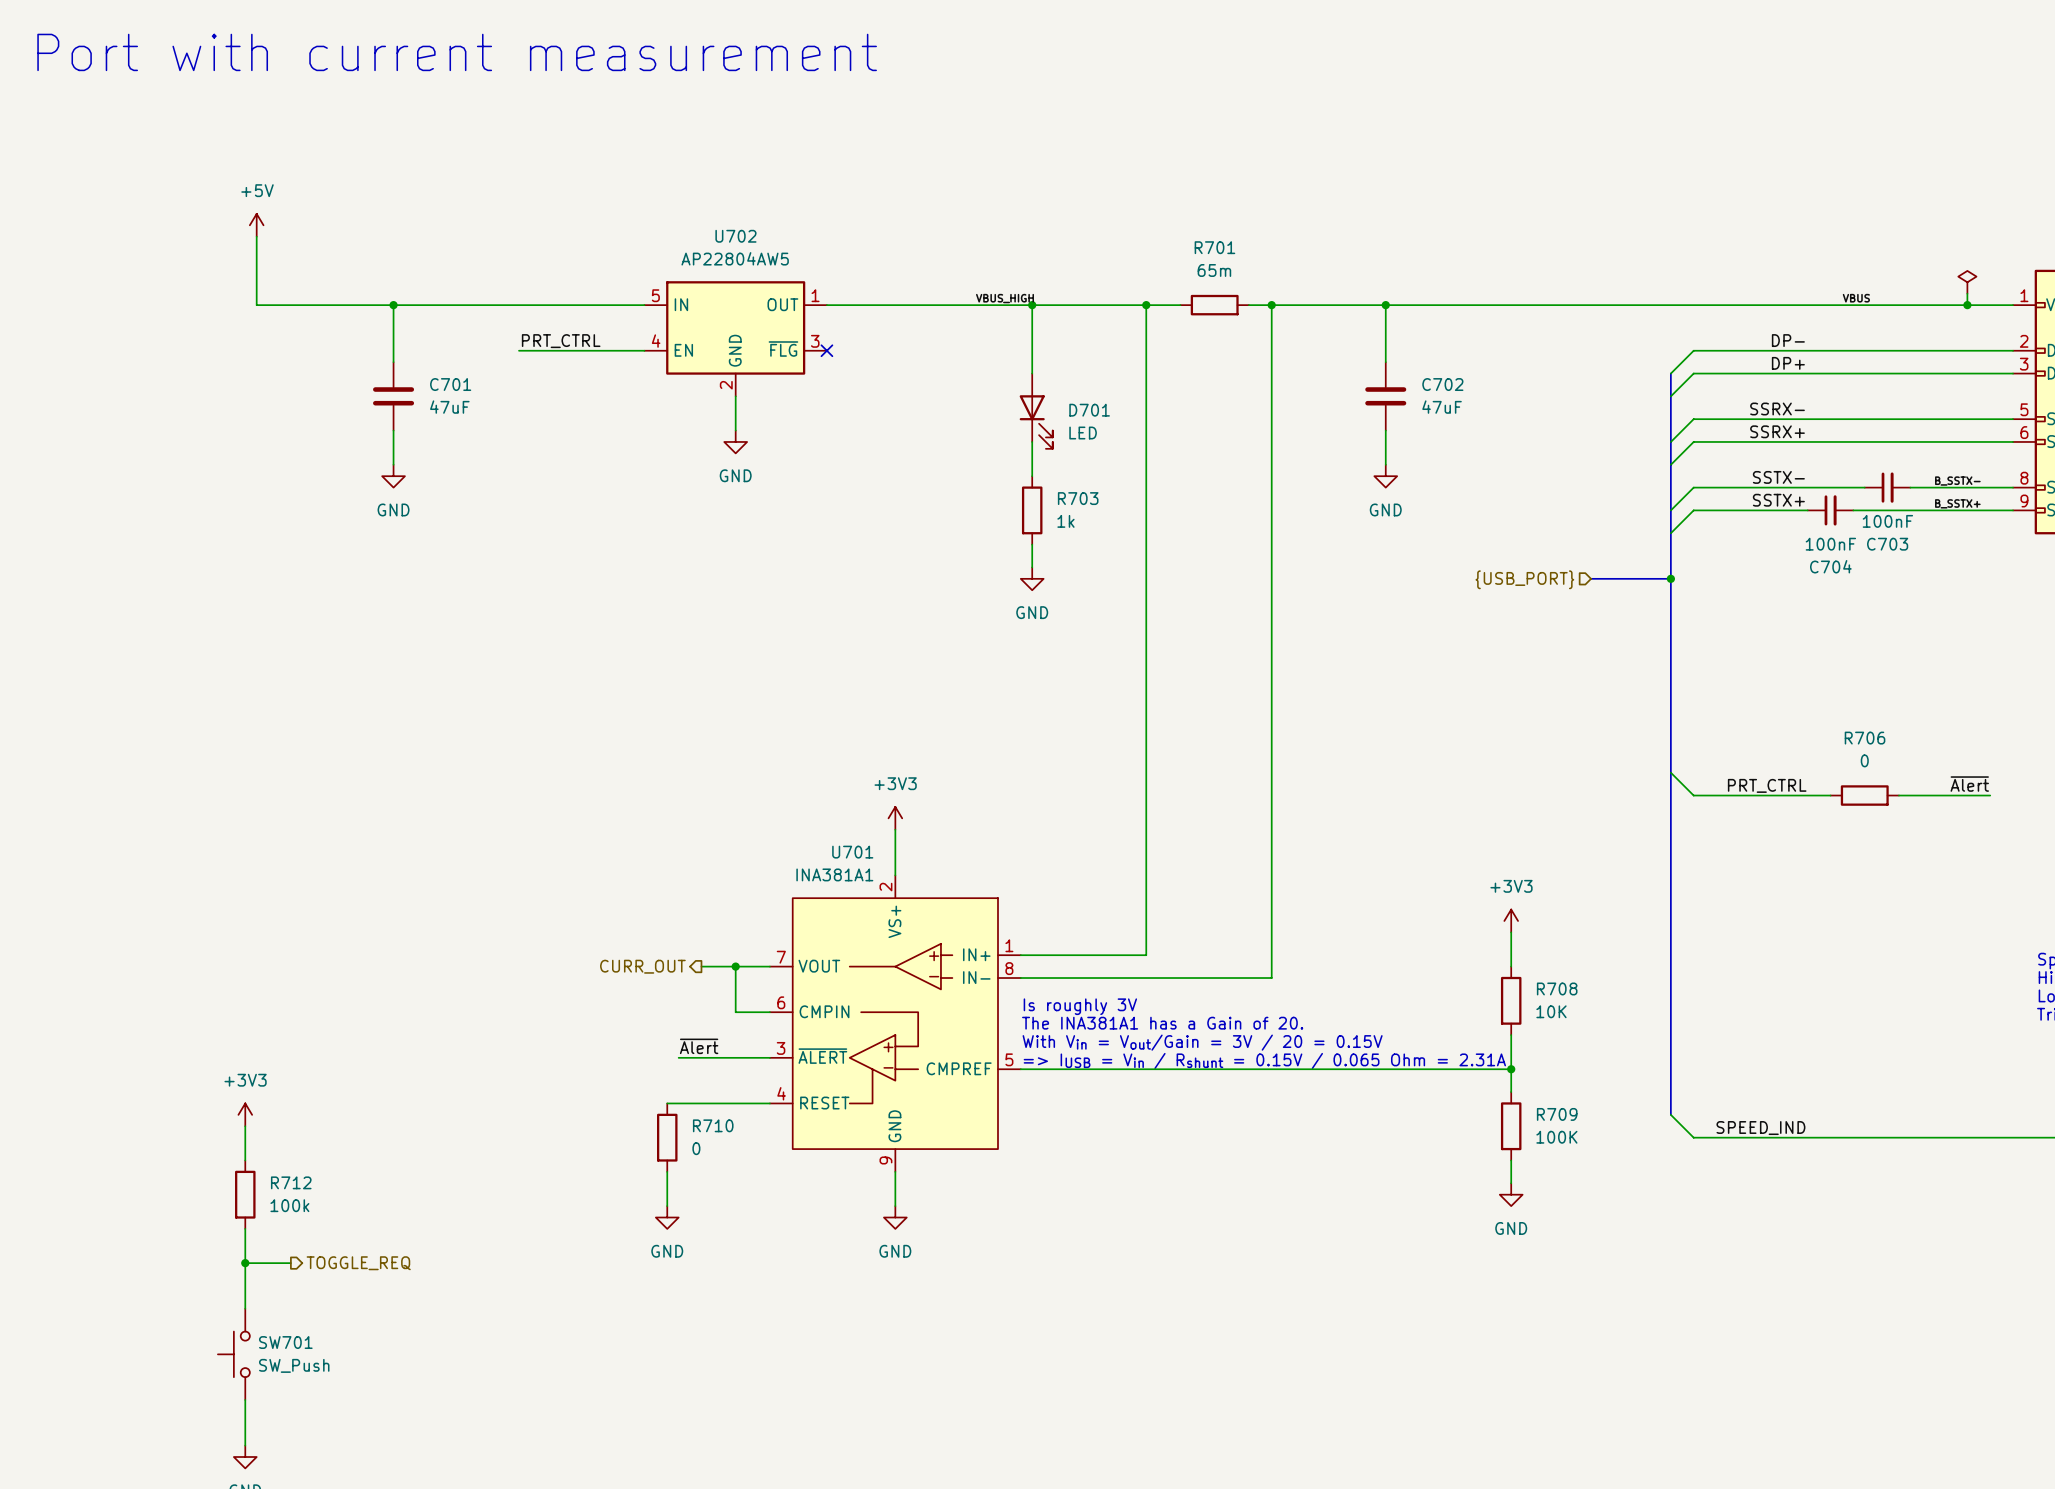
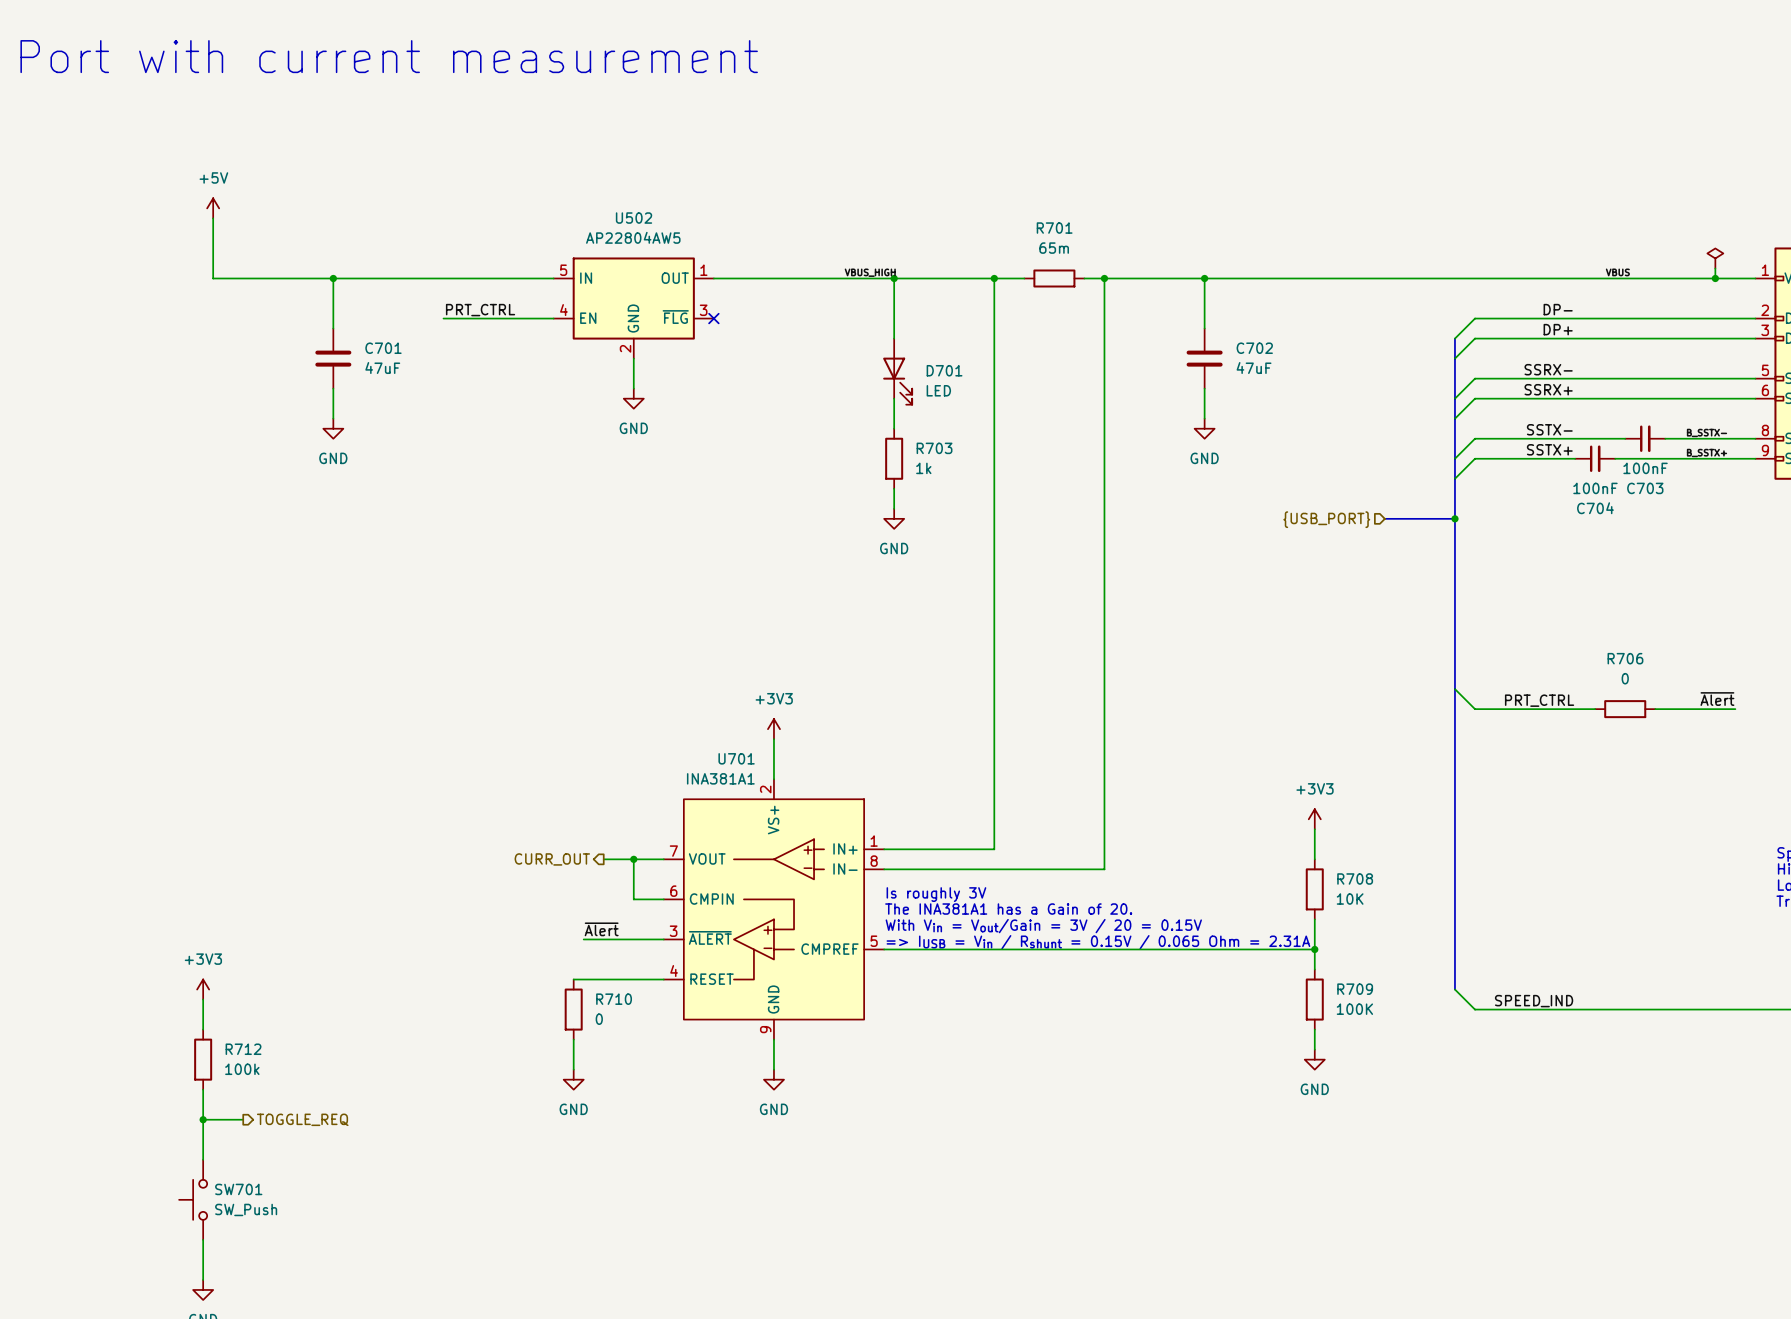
U702 name: U702 (735, 236) -> U502 (634, 218)

